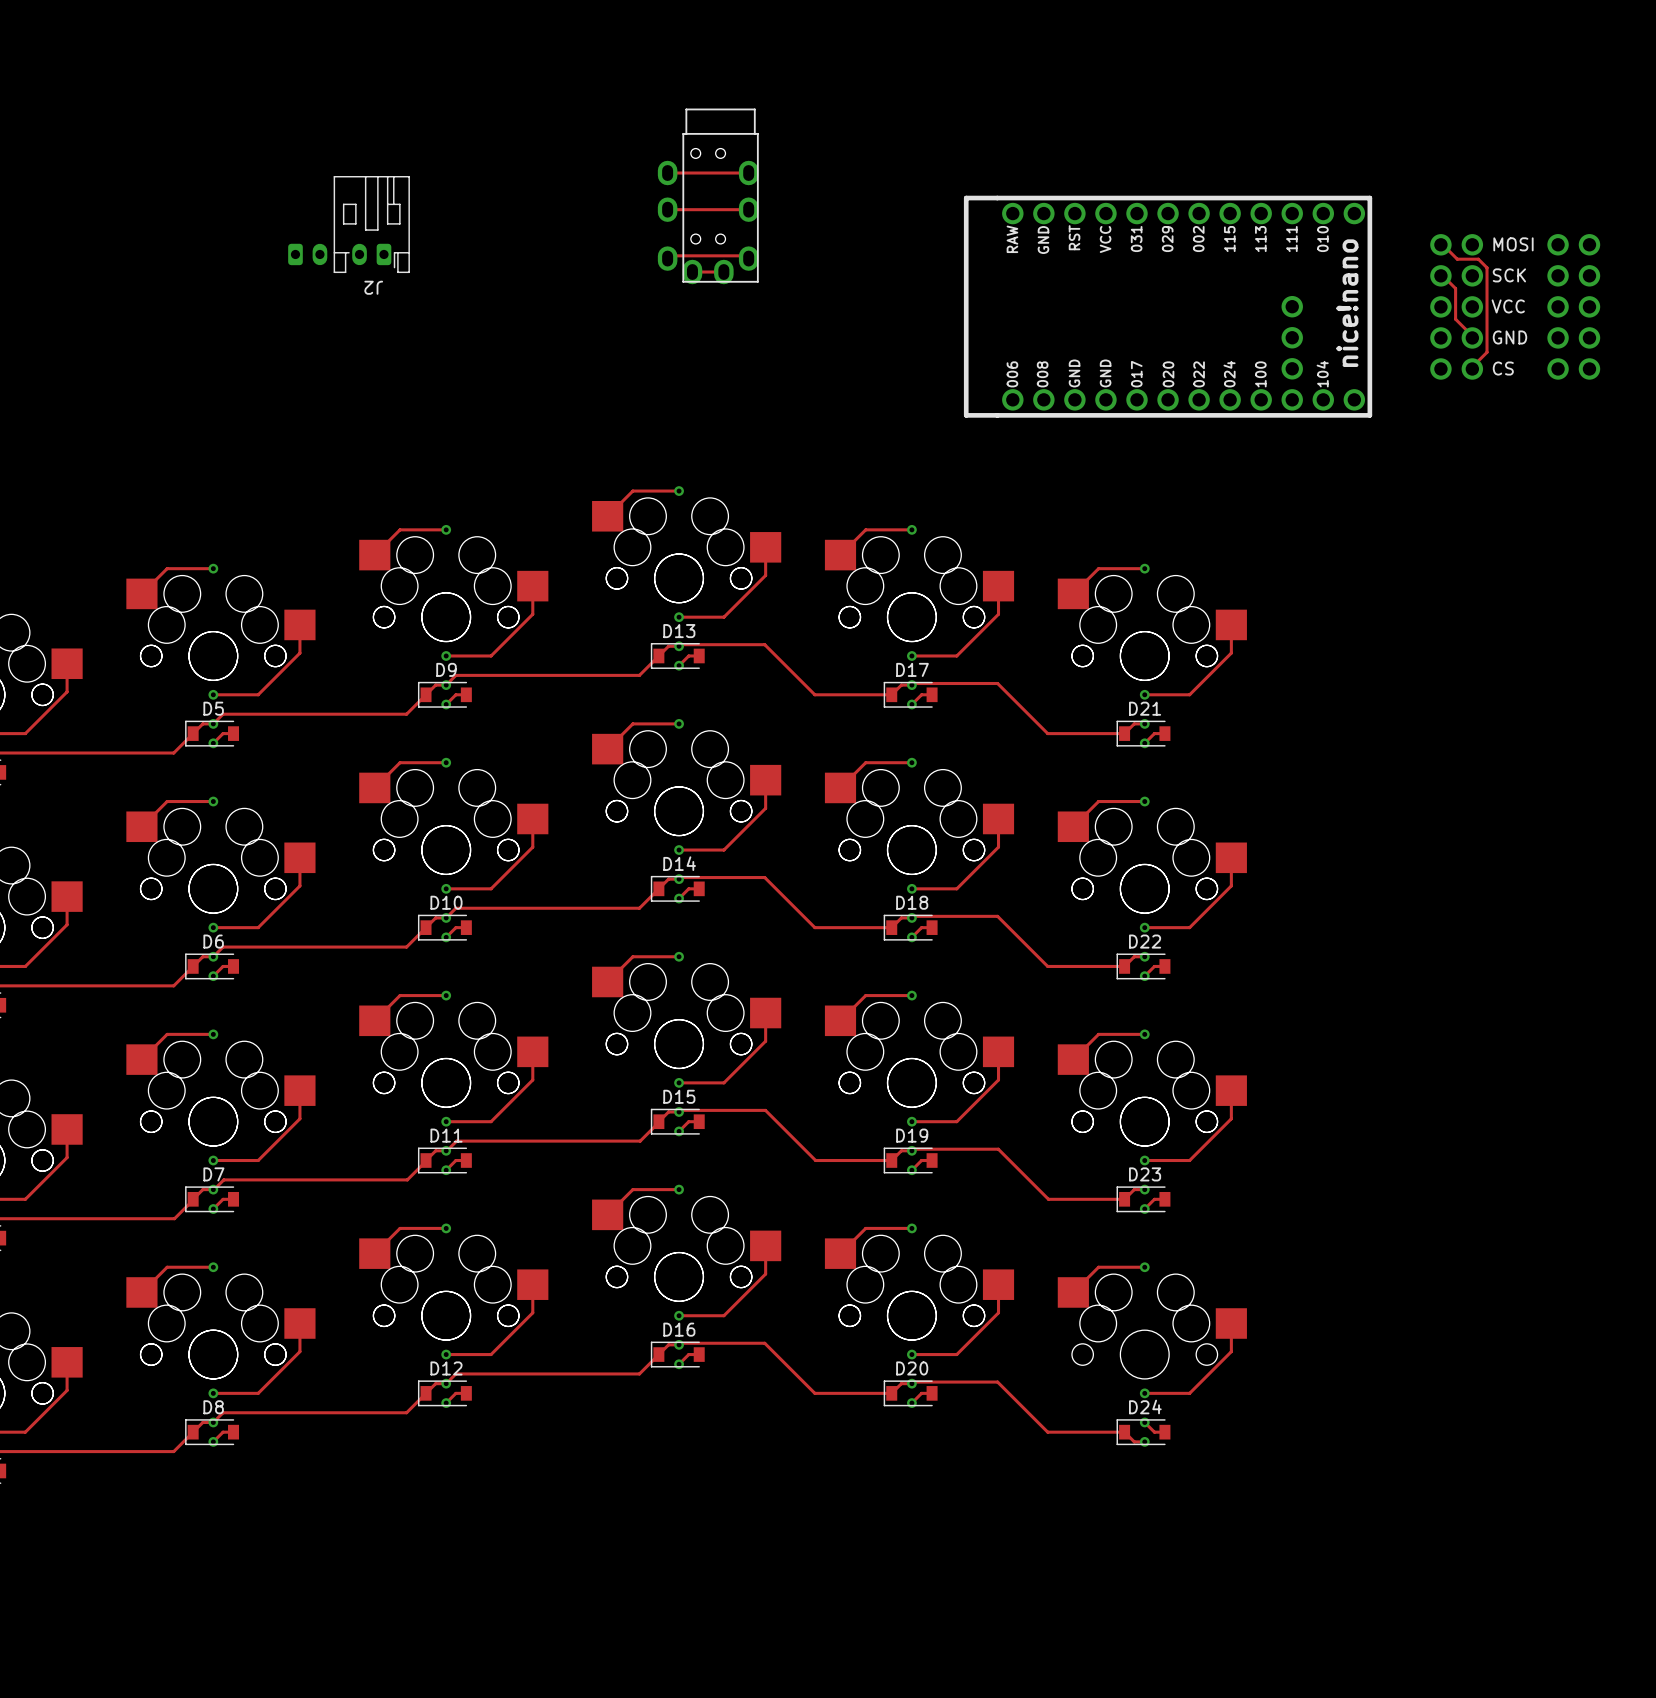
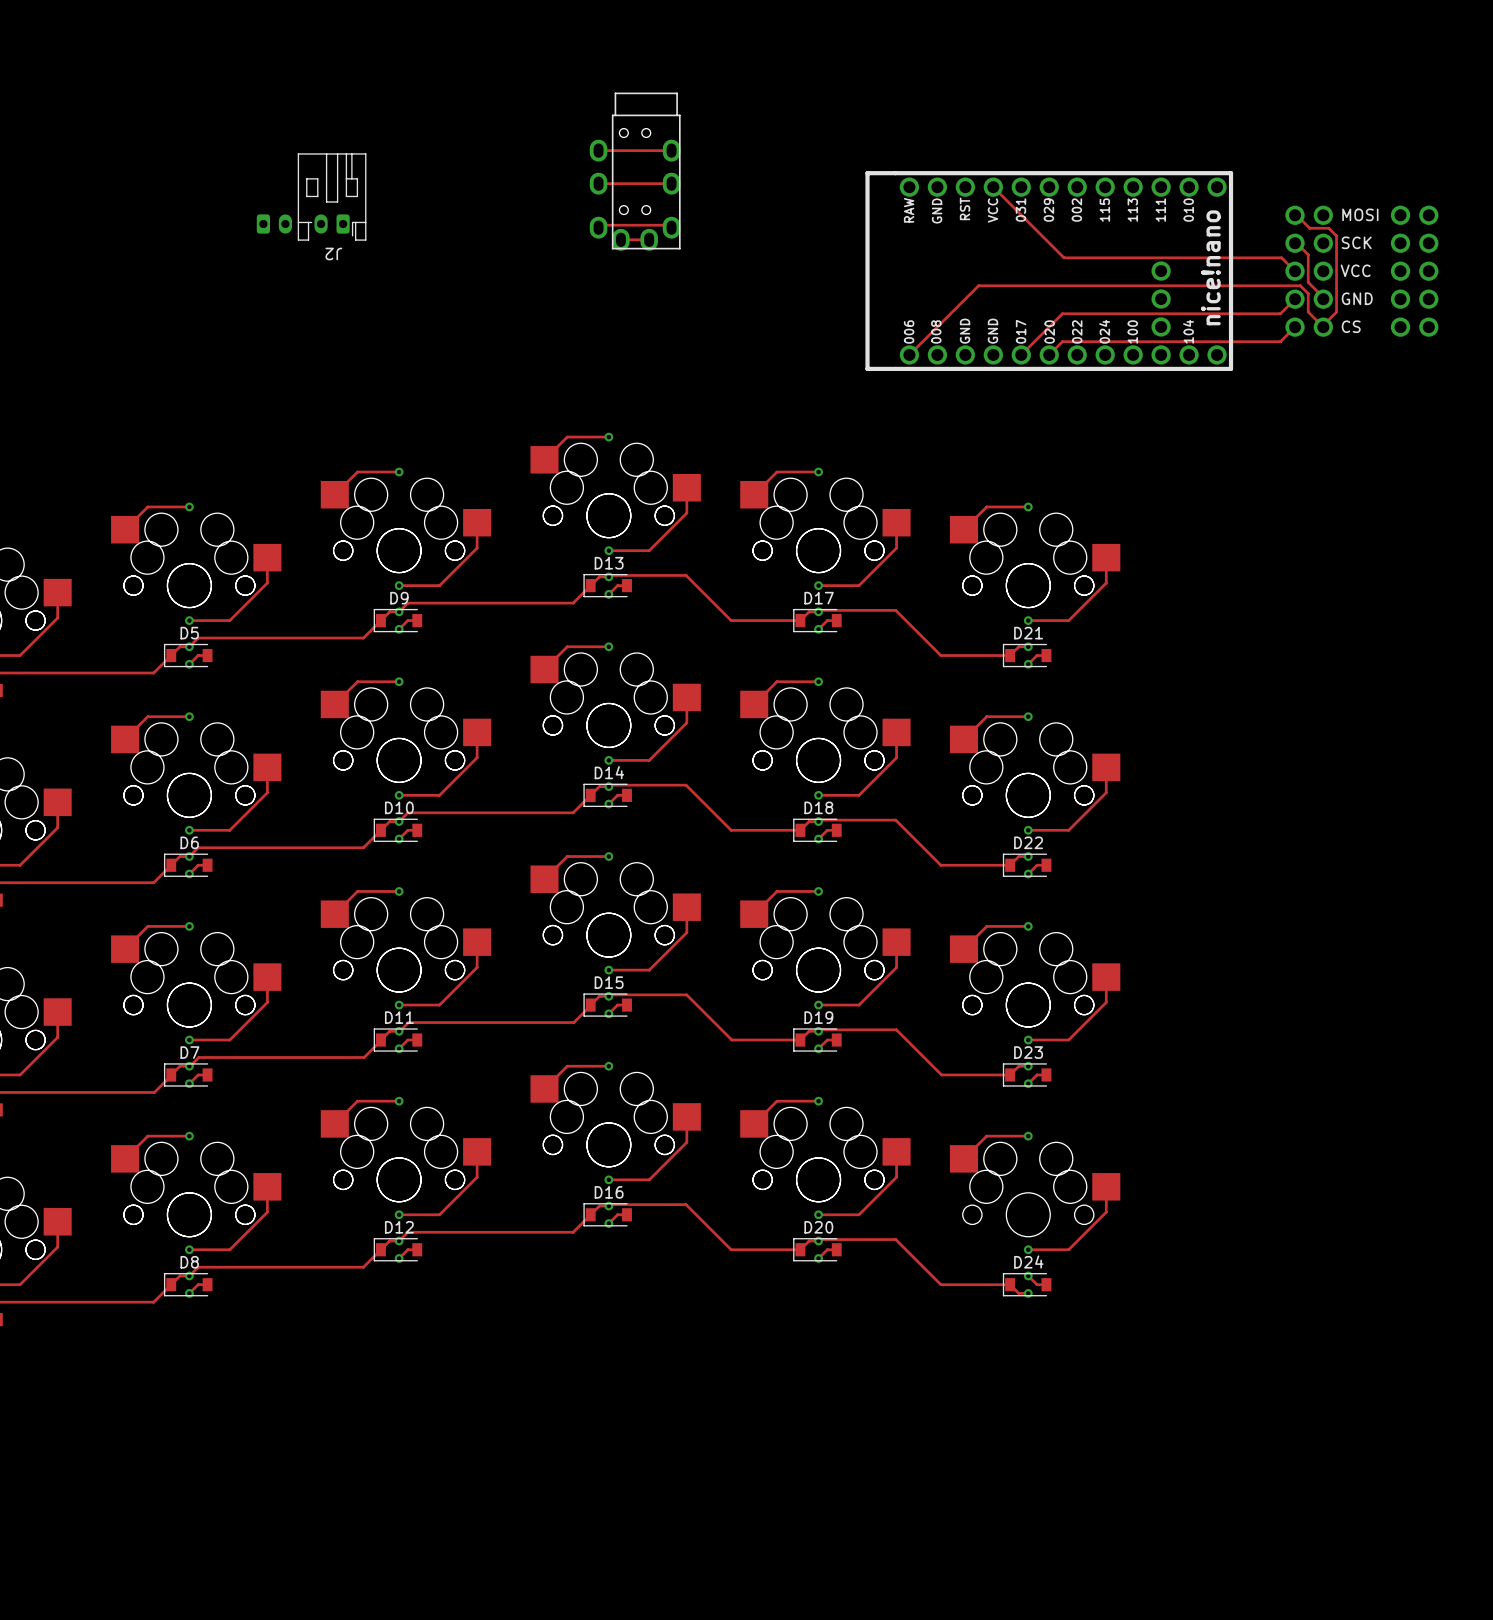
track: none -> (993, 187) (1064, 257) (1281, 257) (1295, 271)
track: none -> (1295, 299) (1280, 313) (1062, 313) (1021, 354)
track: none -> (1295, 327) (1280, 341) (1062, 341) (1049, 354)
track: none -> (1323, 327) (1308, 312) (1308, 293) (1300, 285) (978, 285) (909, 354)

